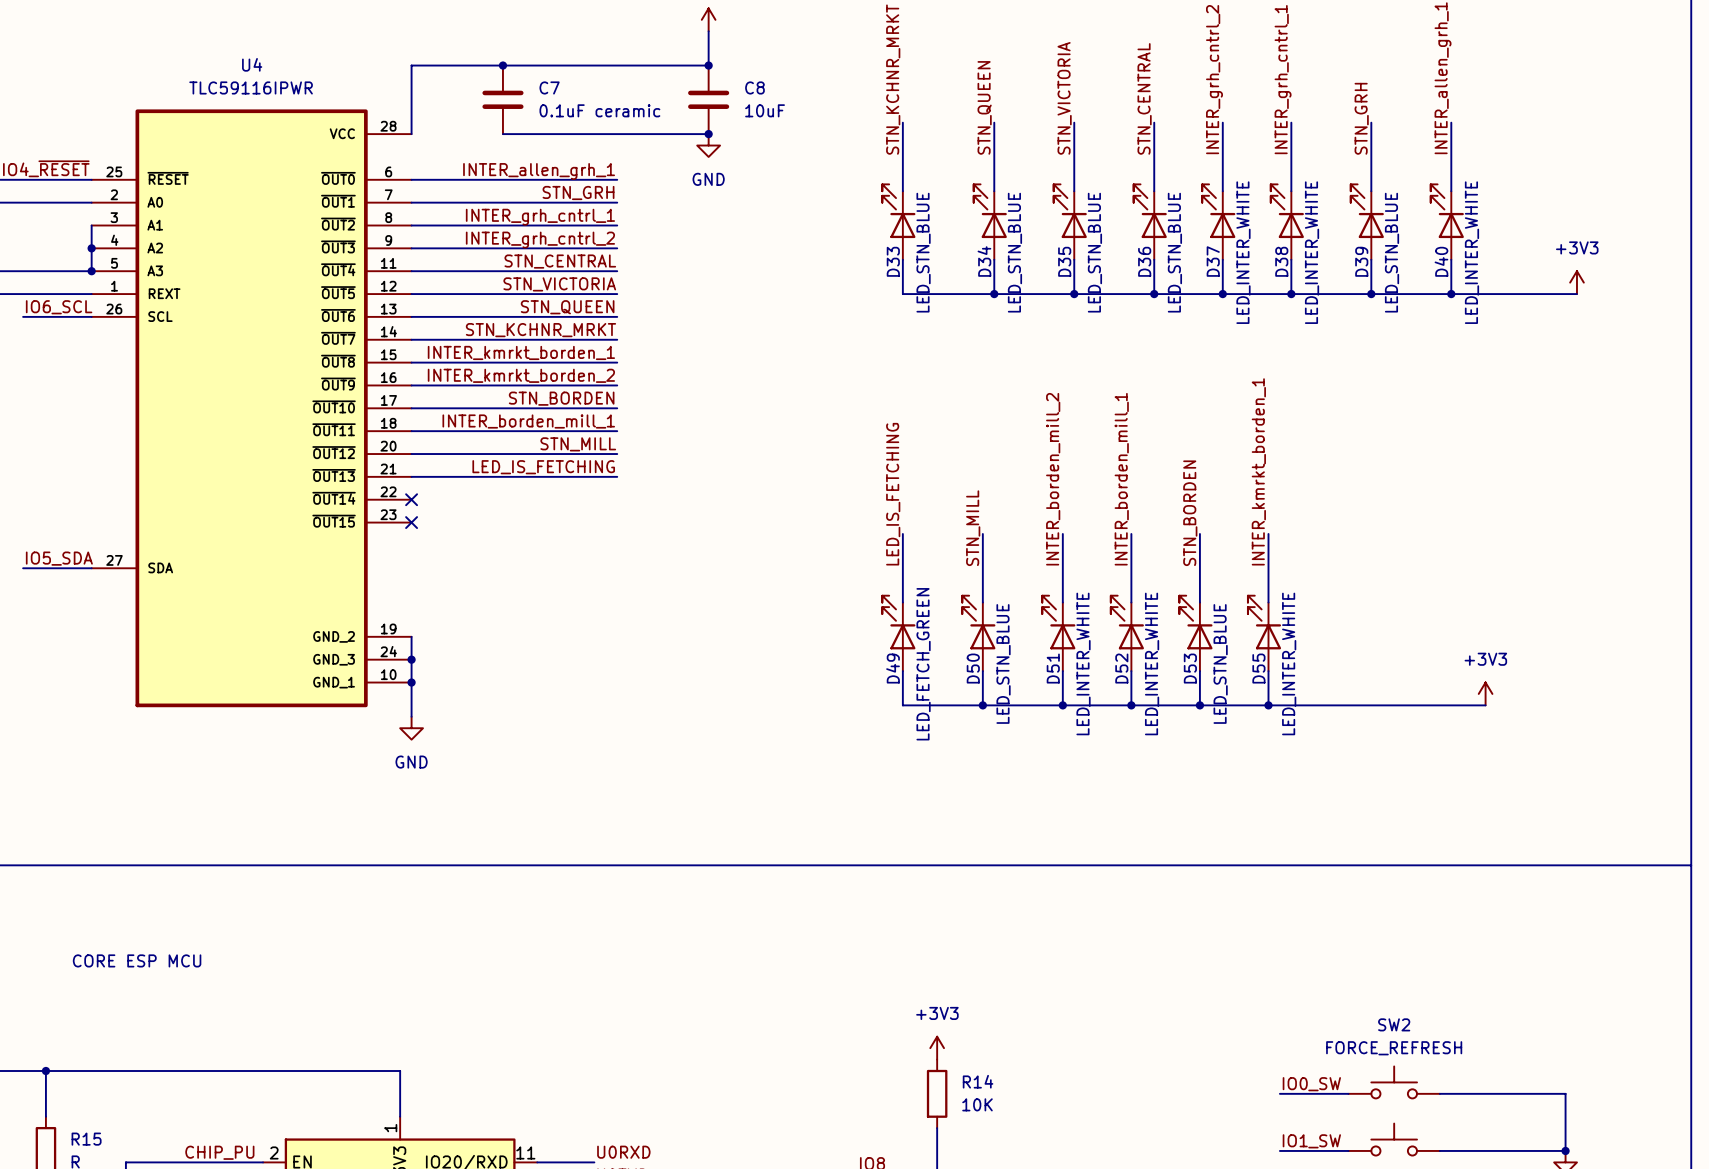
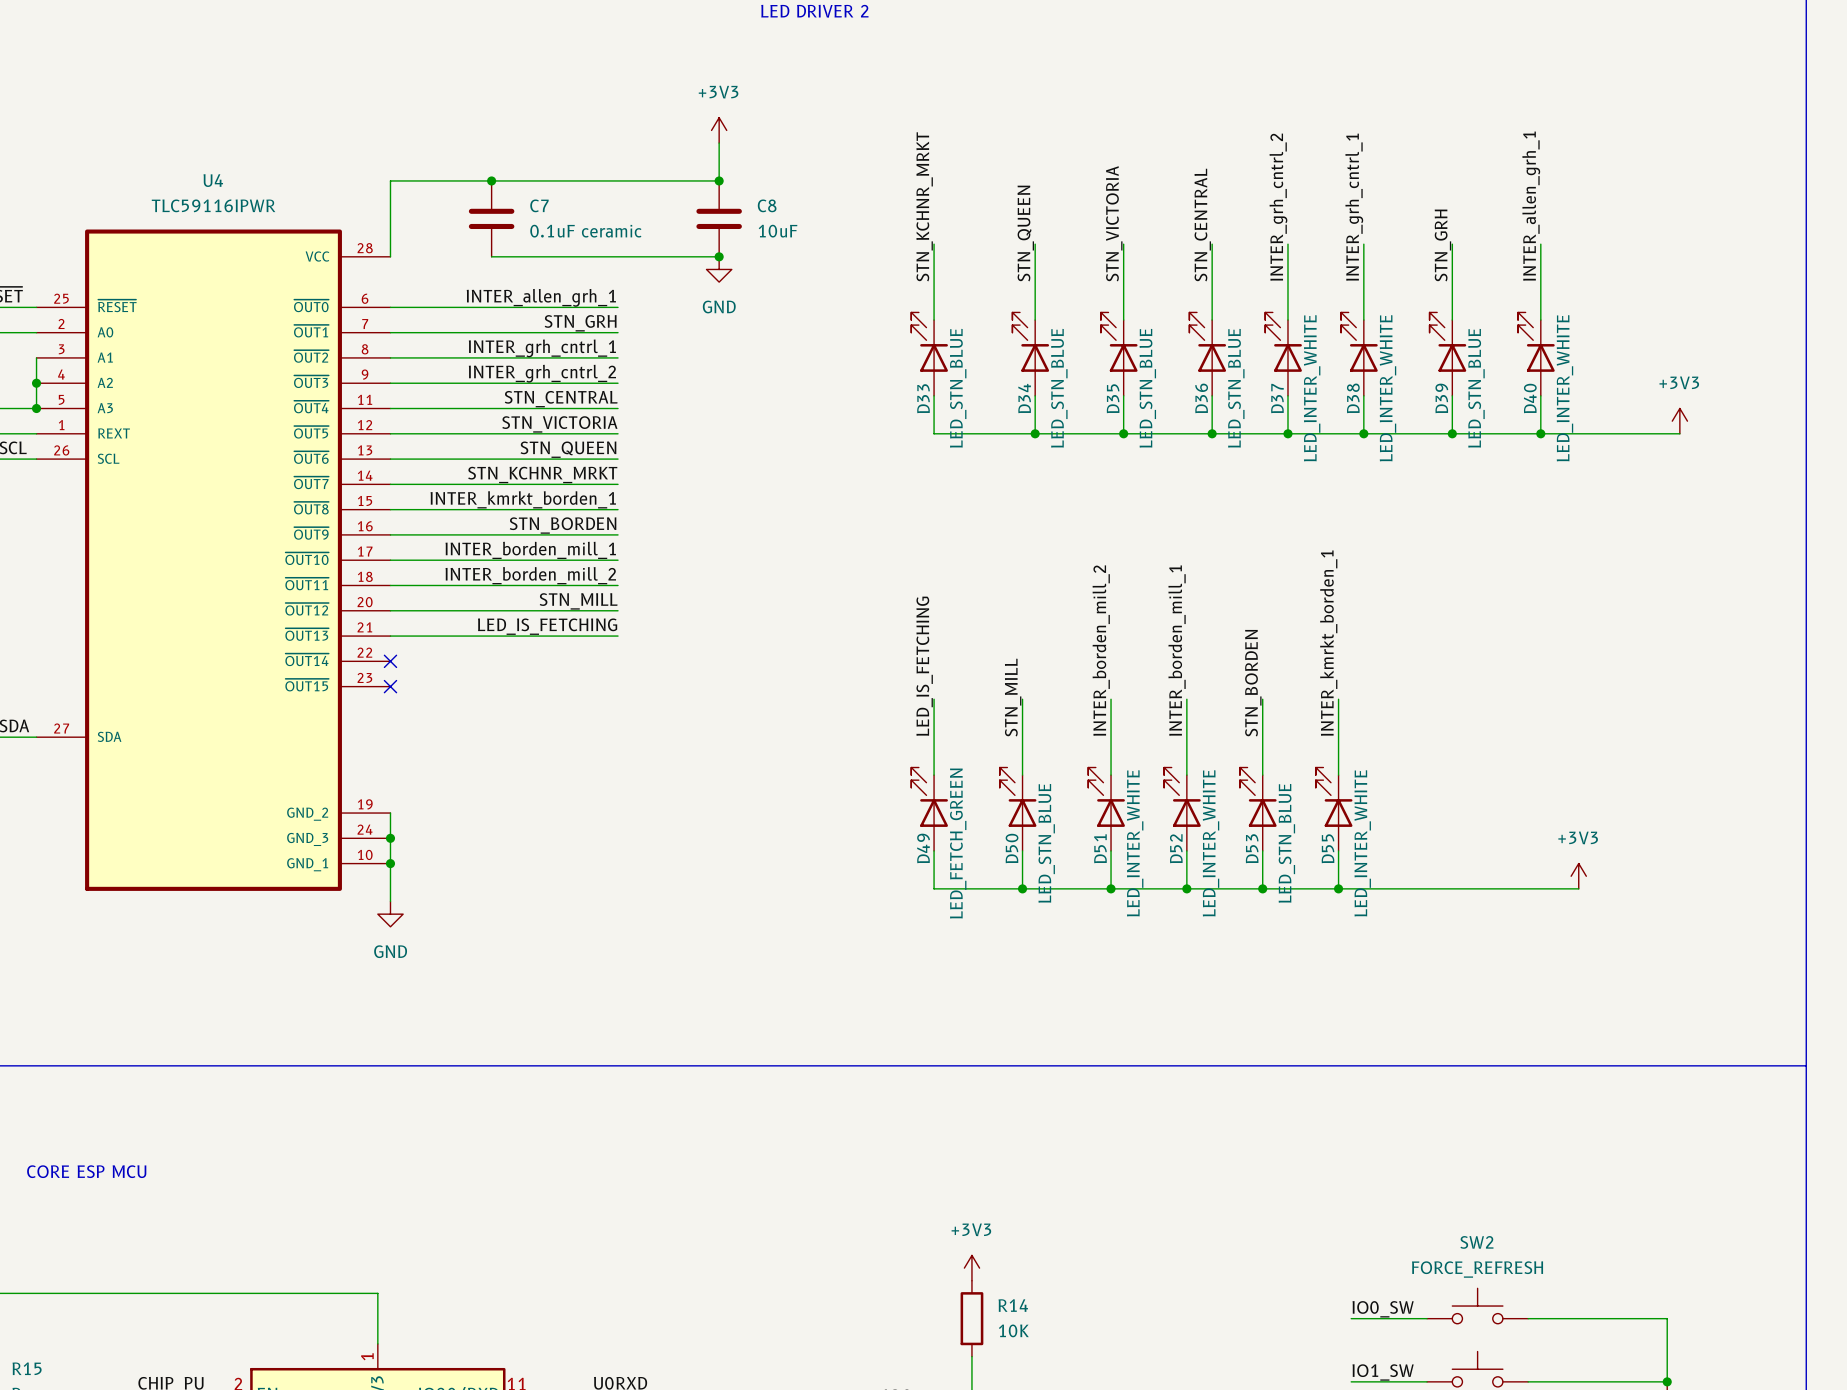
label: INTER_kmrkt_borden_2 (521, 375) -> STN_BORDEN (563, 525)
label: STN_BORDEN (561, 398) -> INTER_borden_mill_1 (530, 550)
label: INTER_borden_mill_1 (528, 421) -> INTER_borden_mill_2 (530, 575)

